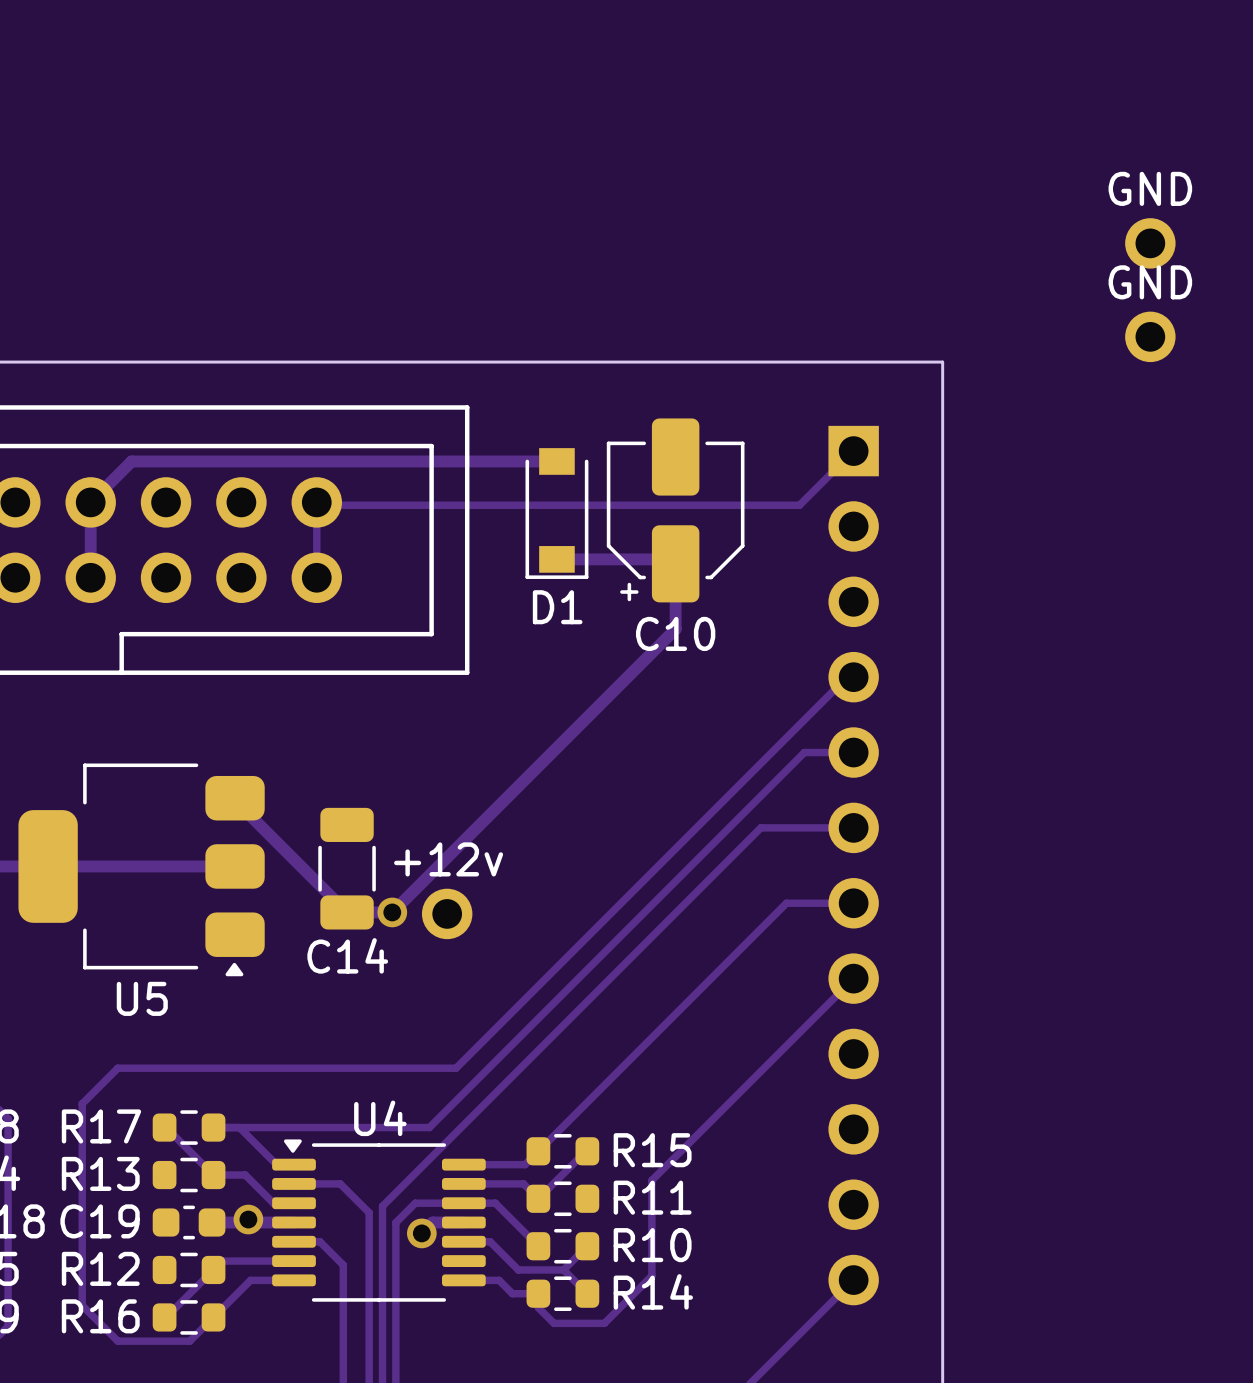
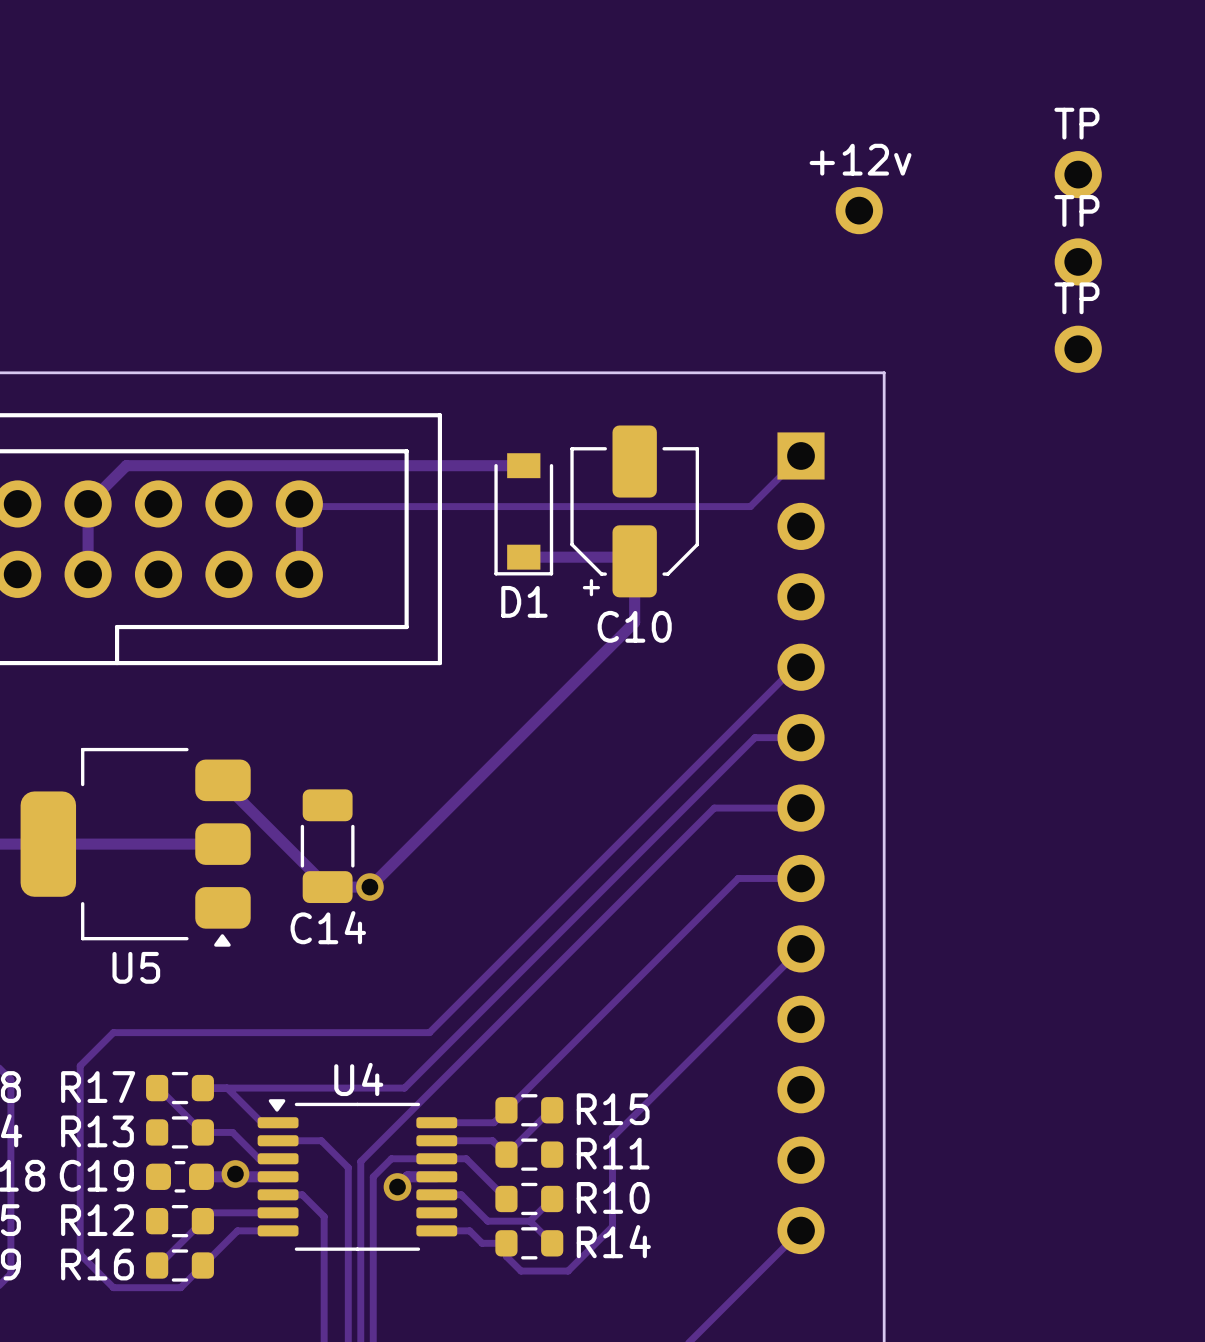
part: none -> (1078, 174)
part: none -> (859, 210)
part text: GND (1150, 188) -> TP (1076, 210)
part text: GND (1150, 282) -> TP (1076, 298)
part: (447, 913) -> none

